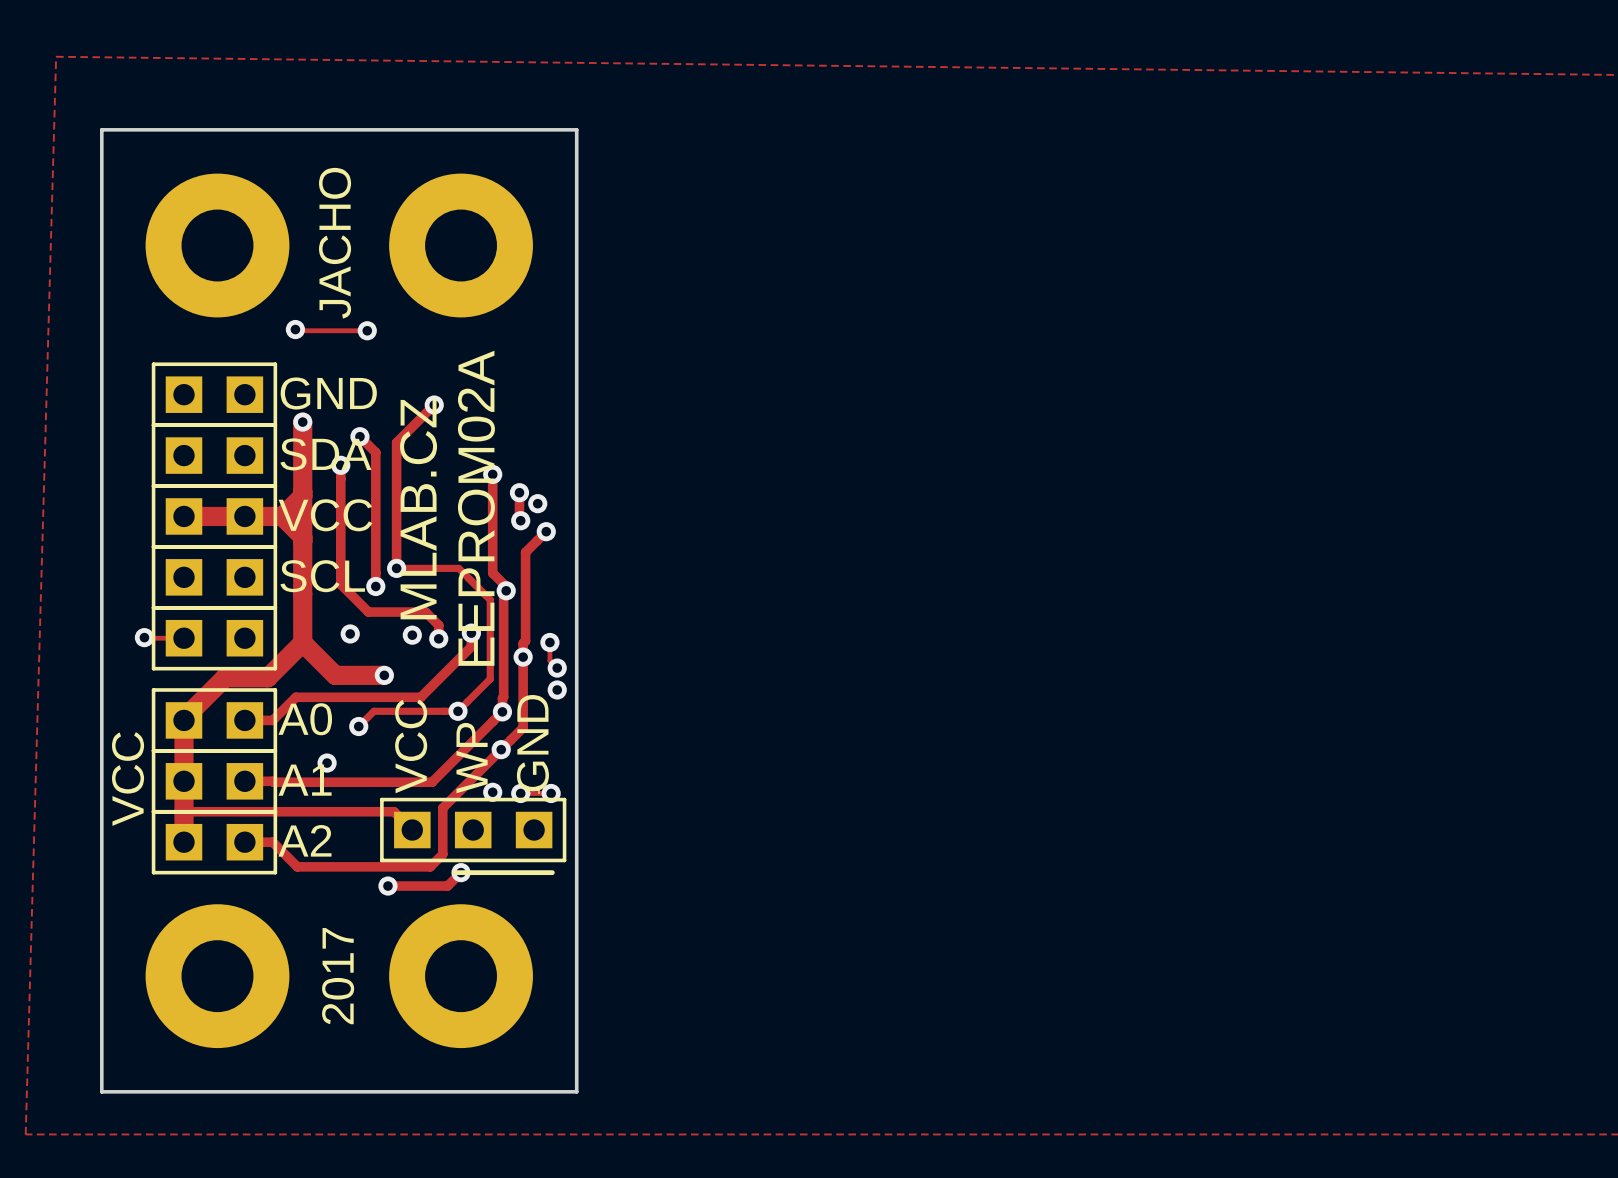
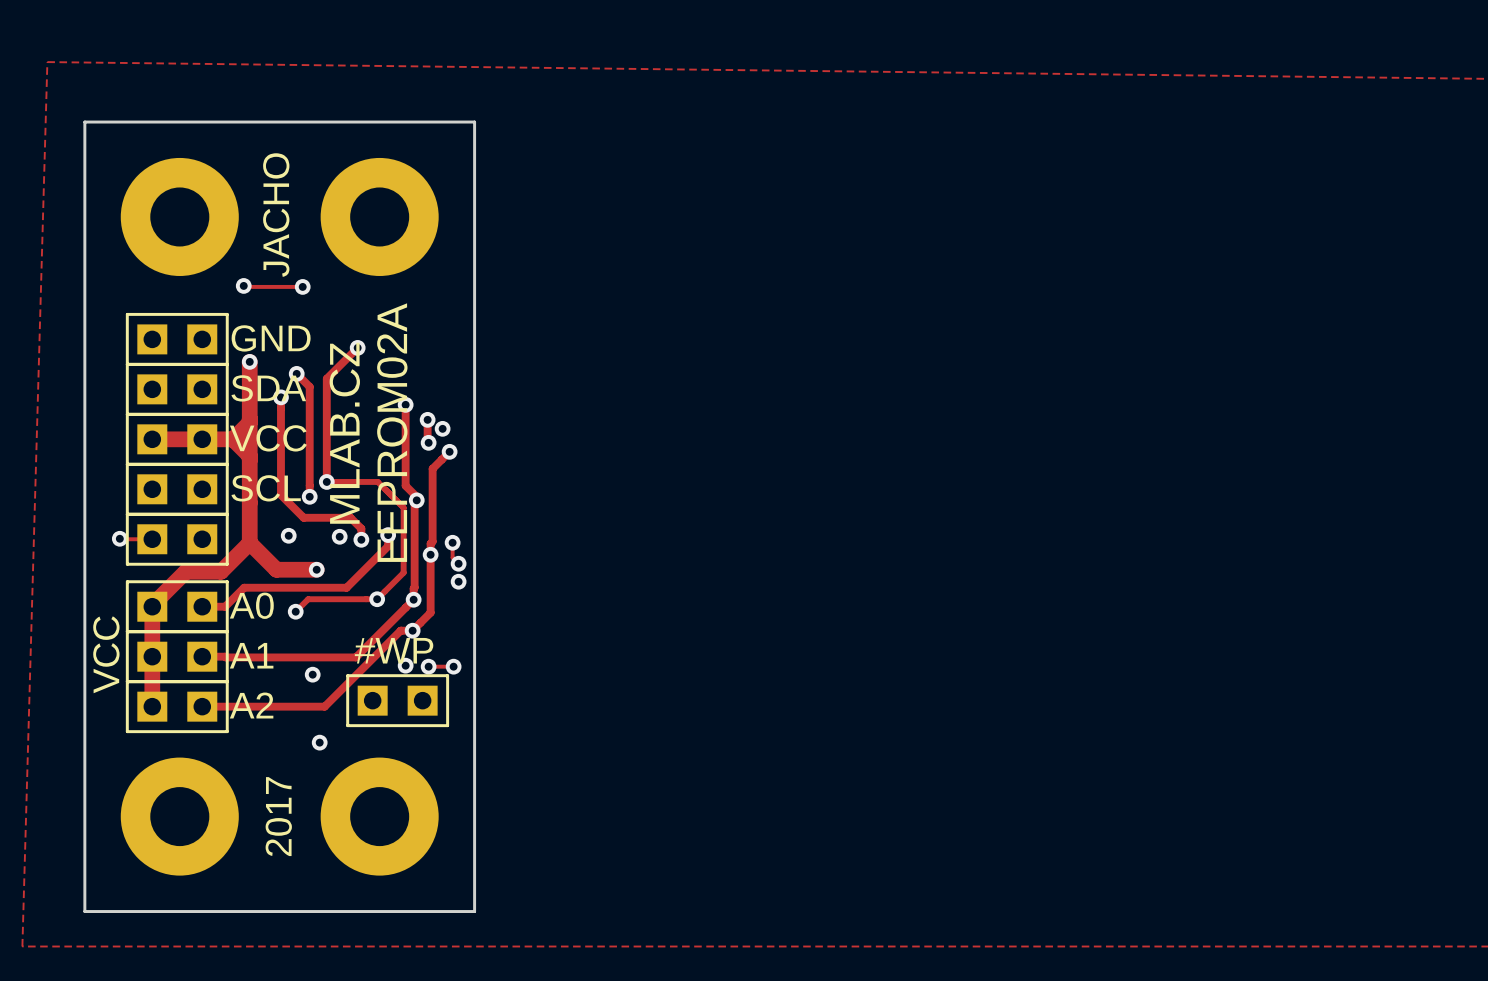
text: GND (532, 743) -> none
text: VCC (411, 746) -> none
track: (501, 749) (442, 808) (442, 854) (430, 866) (297, 866) (272, 842) -> (412, 630) (400, 630) (324, 706) (225, 706)
text: WP (472, 758) -> #WP (394, 650)
via: (327, 763) -> none
part footprint: [380, 797, 567, 863] -> [346, 674, 450, 728]
via: none -> (312, 674)
track: (184, 811) (394, 811) (412, 830) -> none
line: (454, 872) (552, 872) -> none
track: (461, 872) (447, 886) (387, 886) -> none
via: (461, 872) -> none

